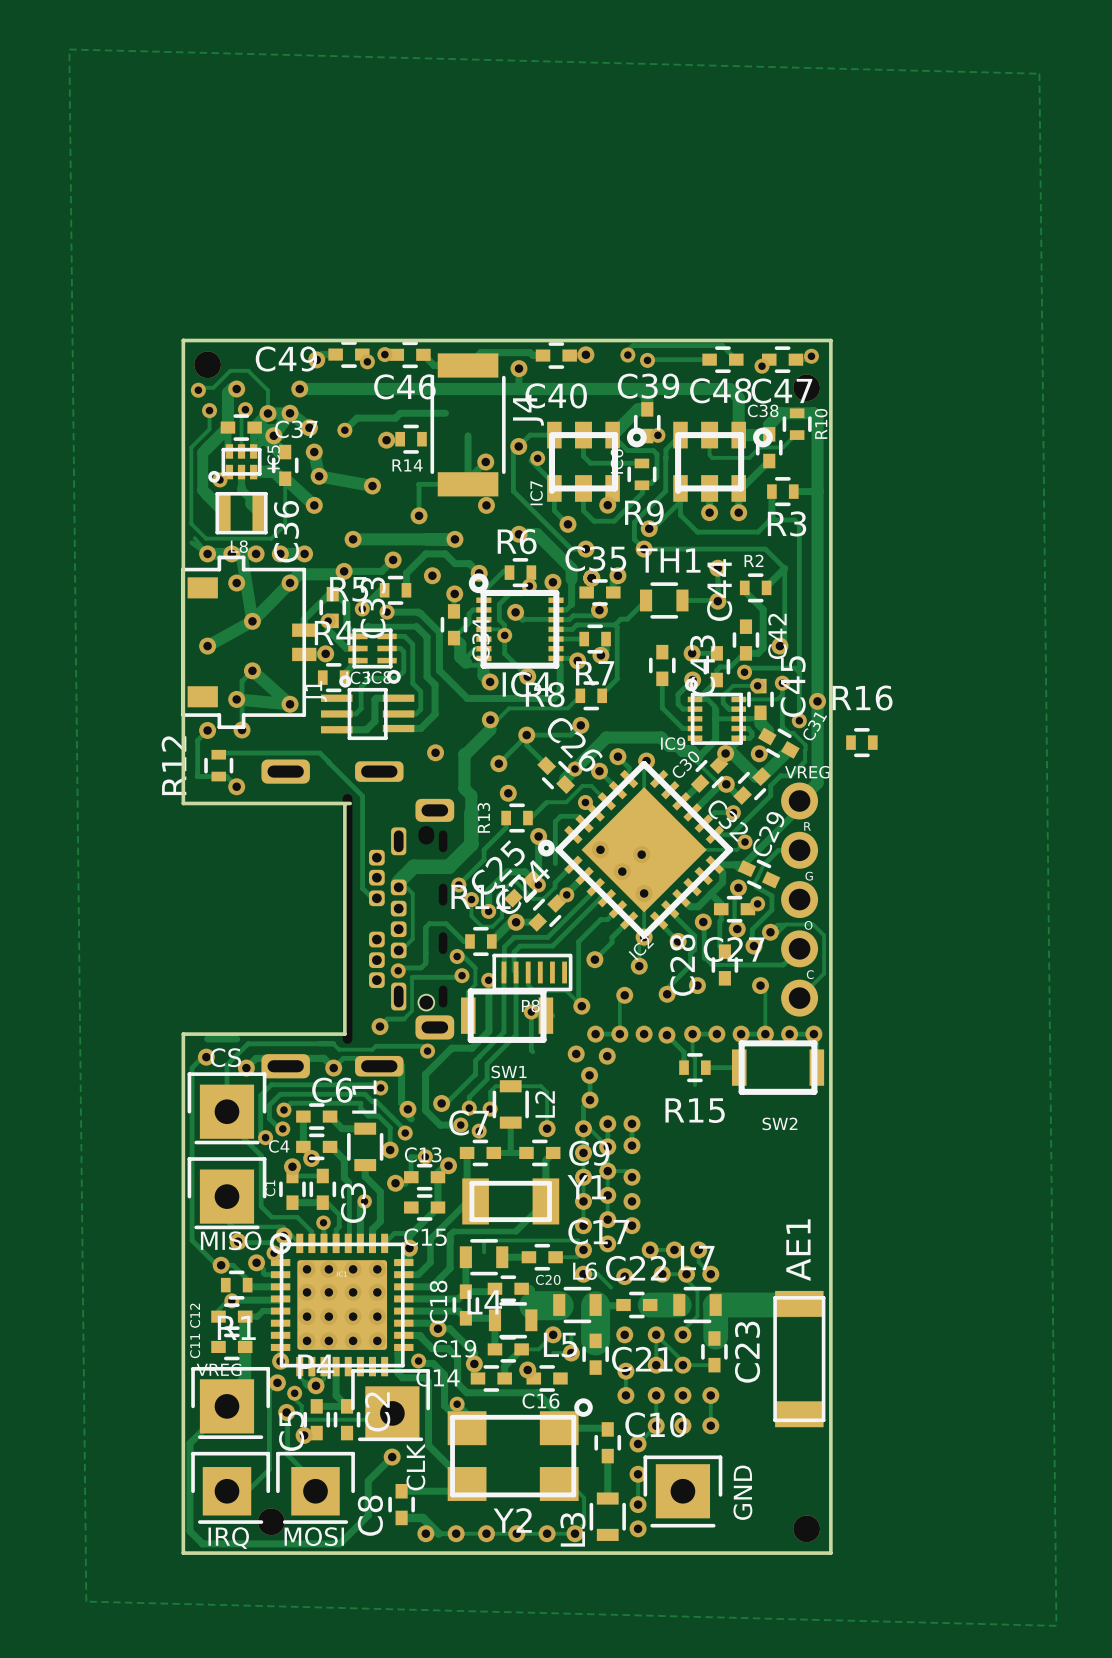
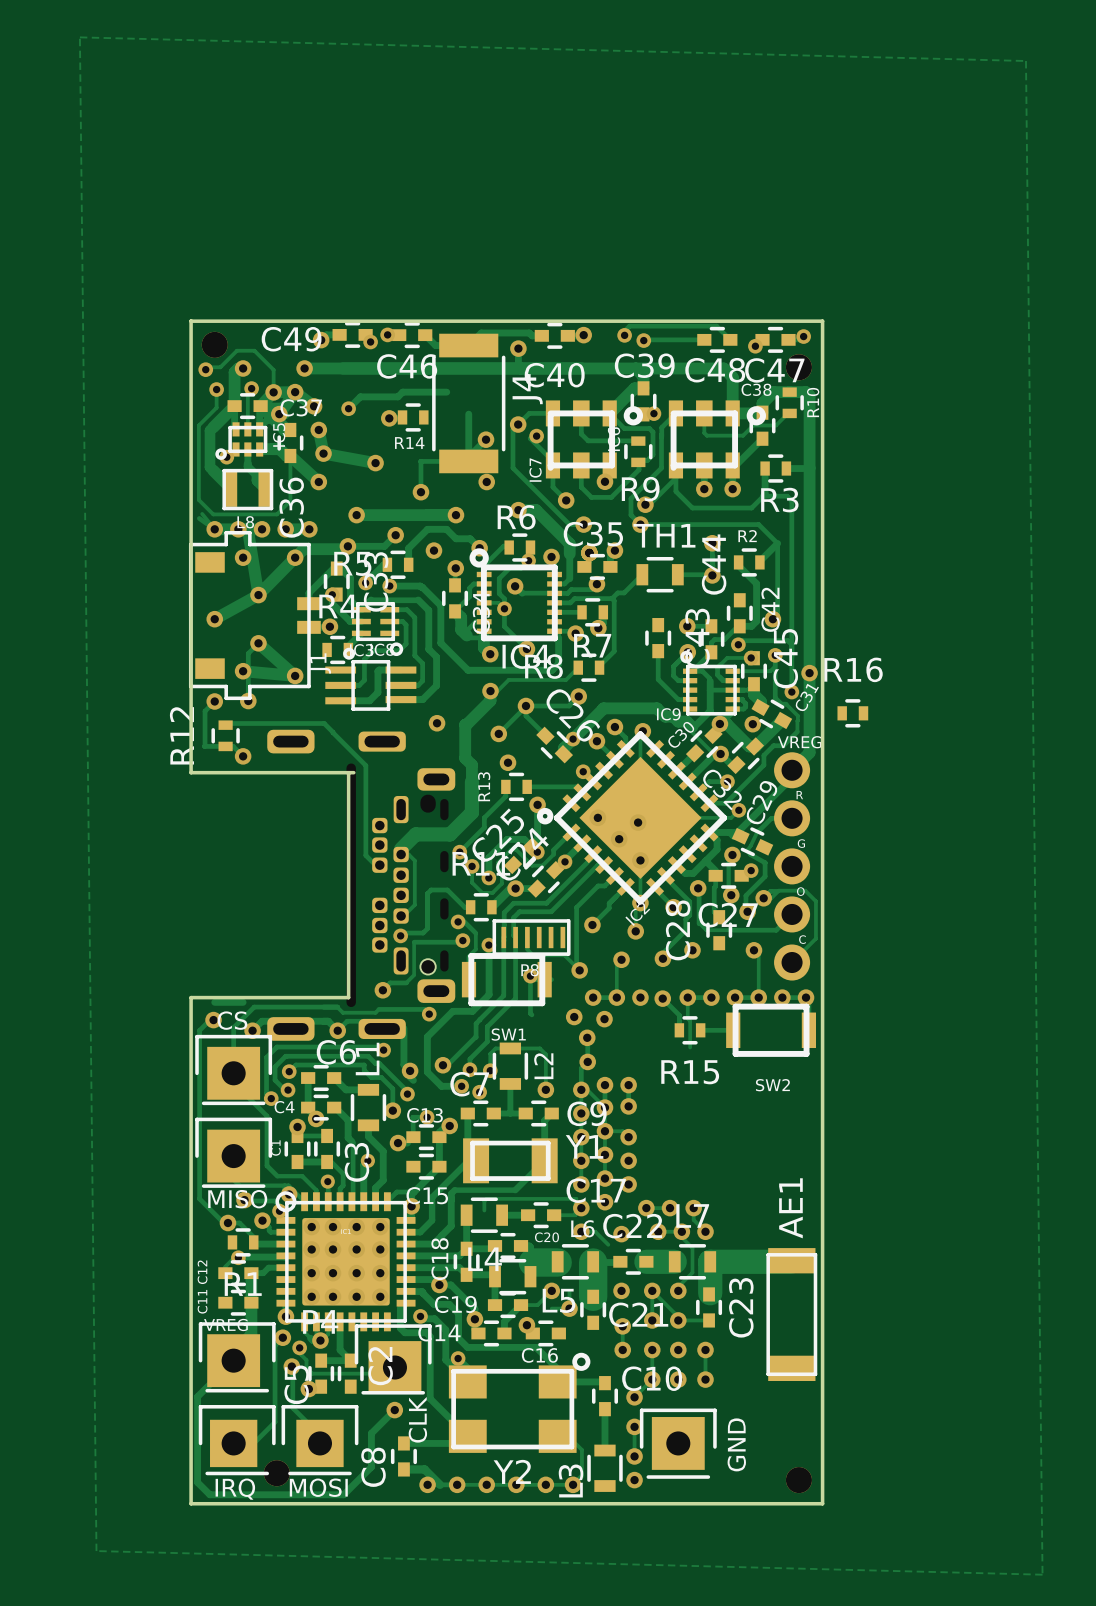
track: (606, 801) (591, 786) (582, 786) (566, 802) (546, 802) (531, 818) -> (581, 792) (576, 786) (530, 786)
track: (584, 823) (577, 816) (560, 816) (555, 821) (555, 863) -> none

